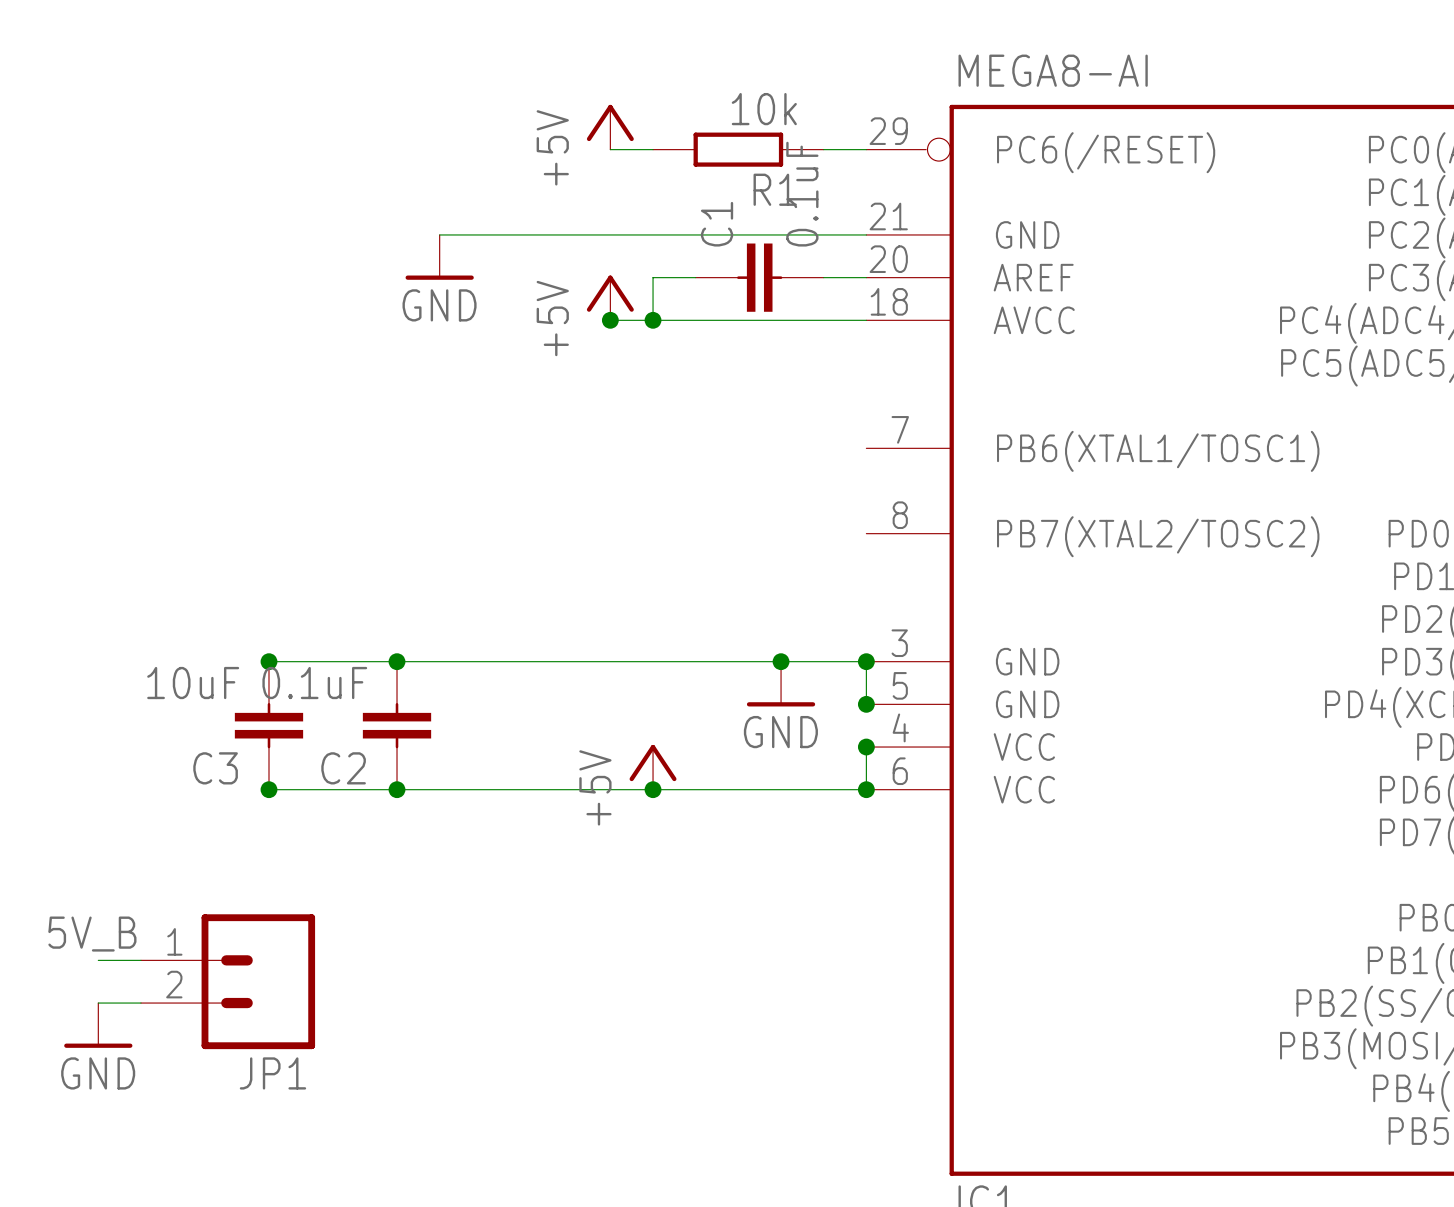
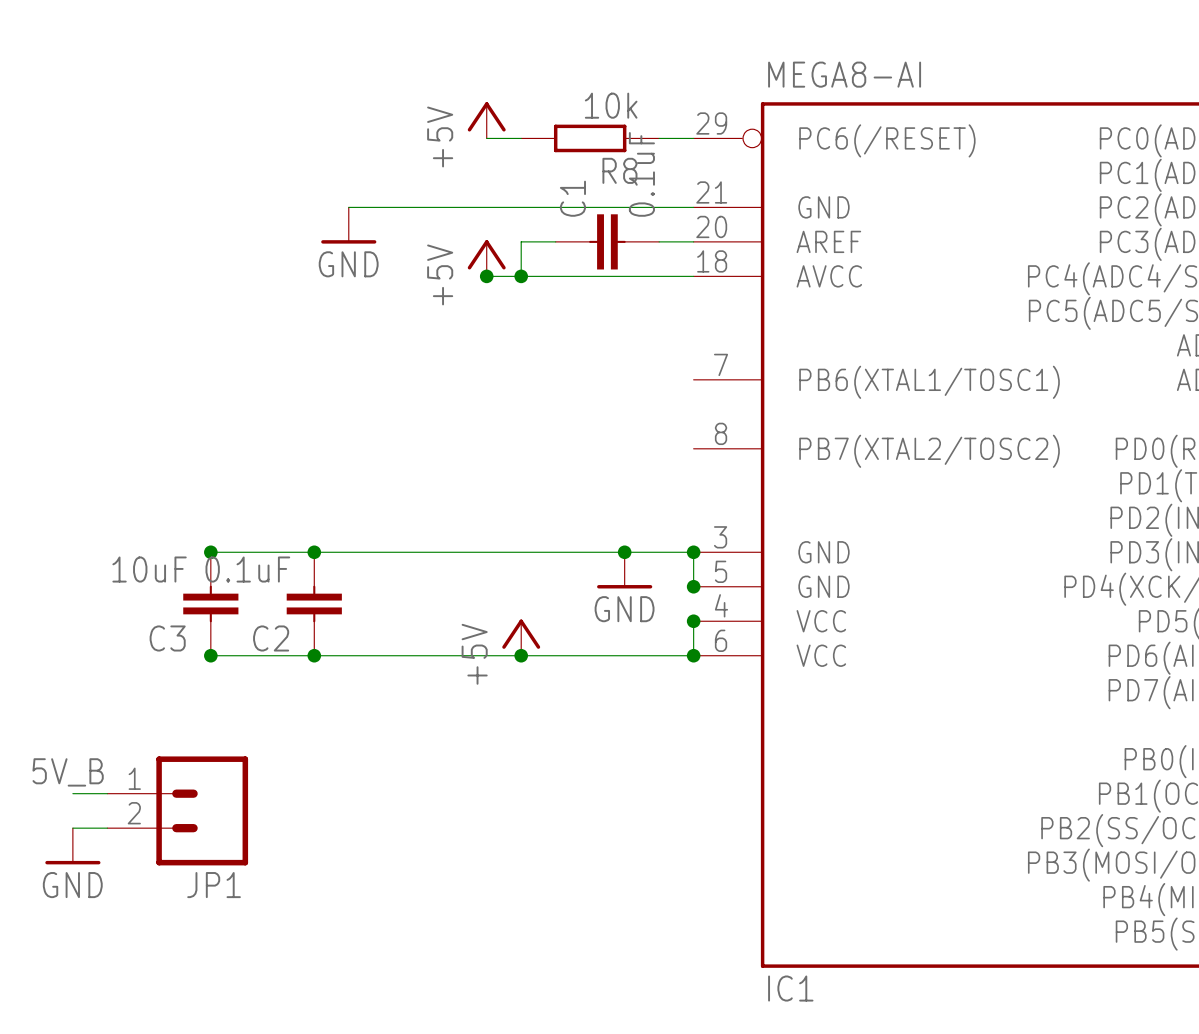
R1 name: R1 (775, 189) -> R8 (619, 170)

